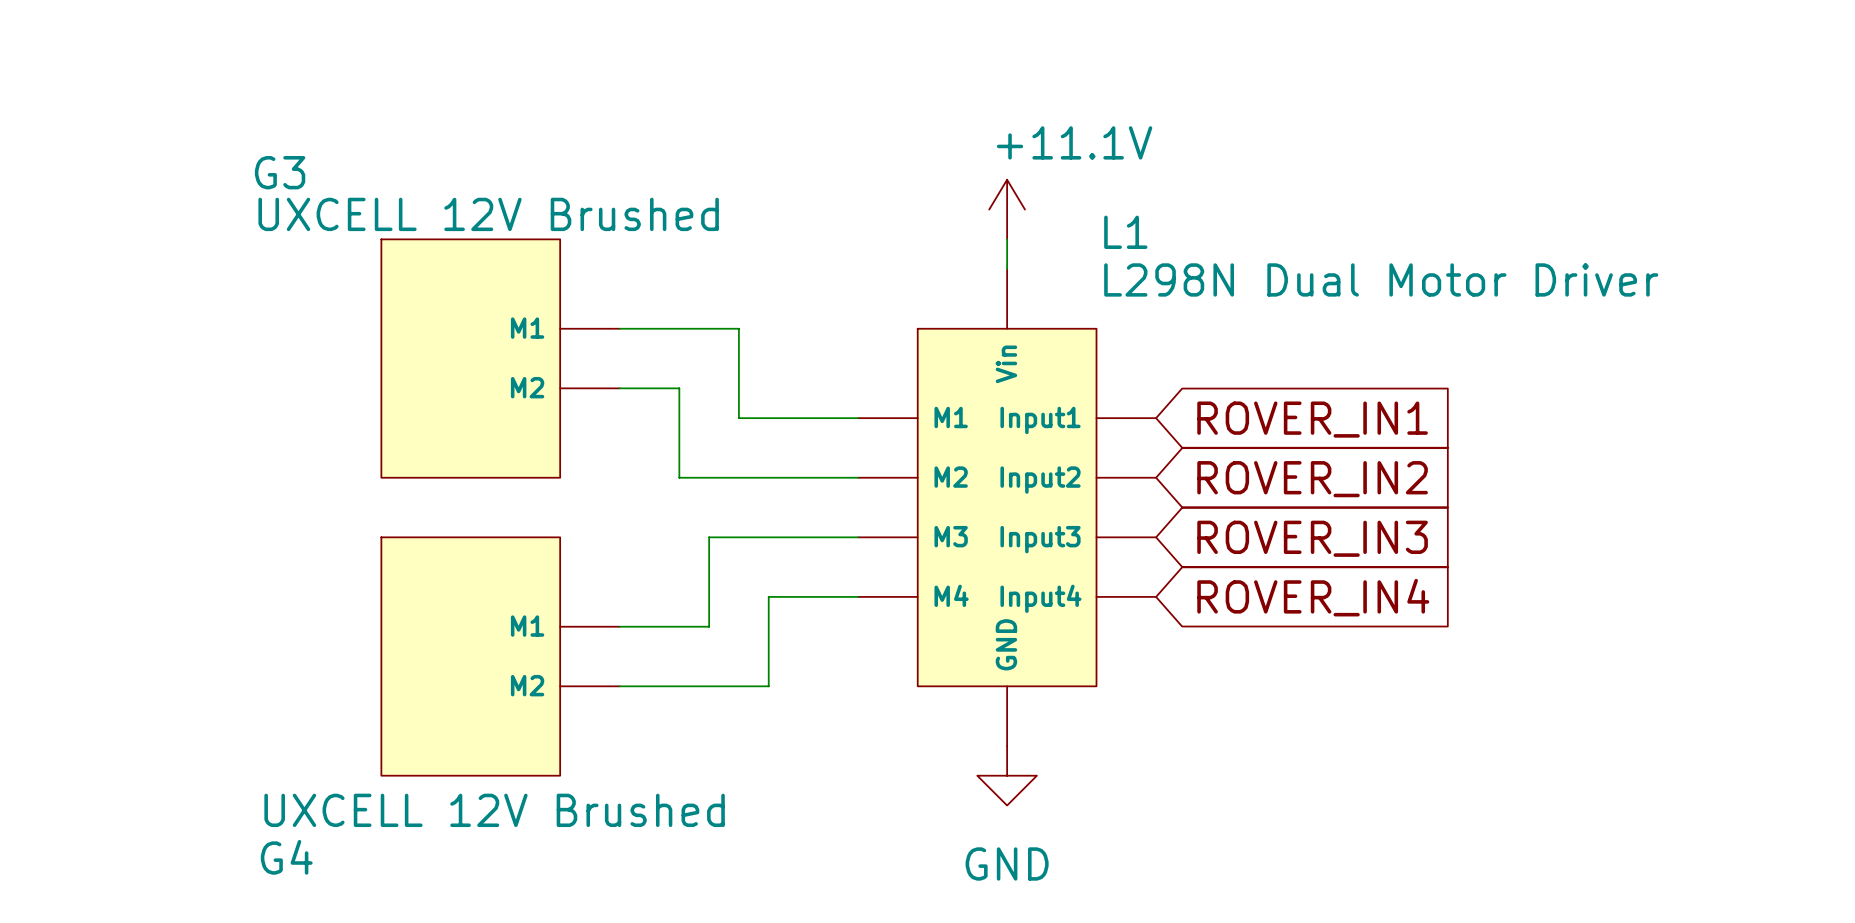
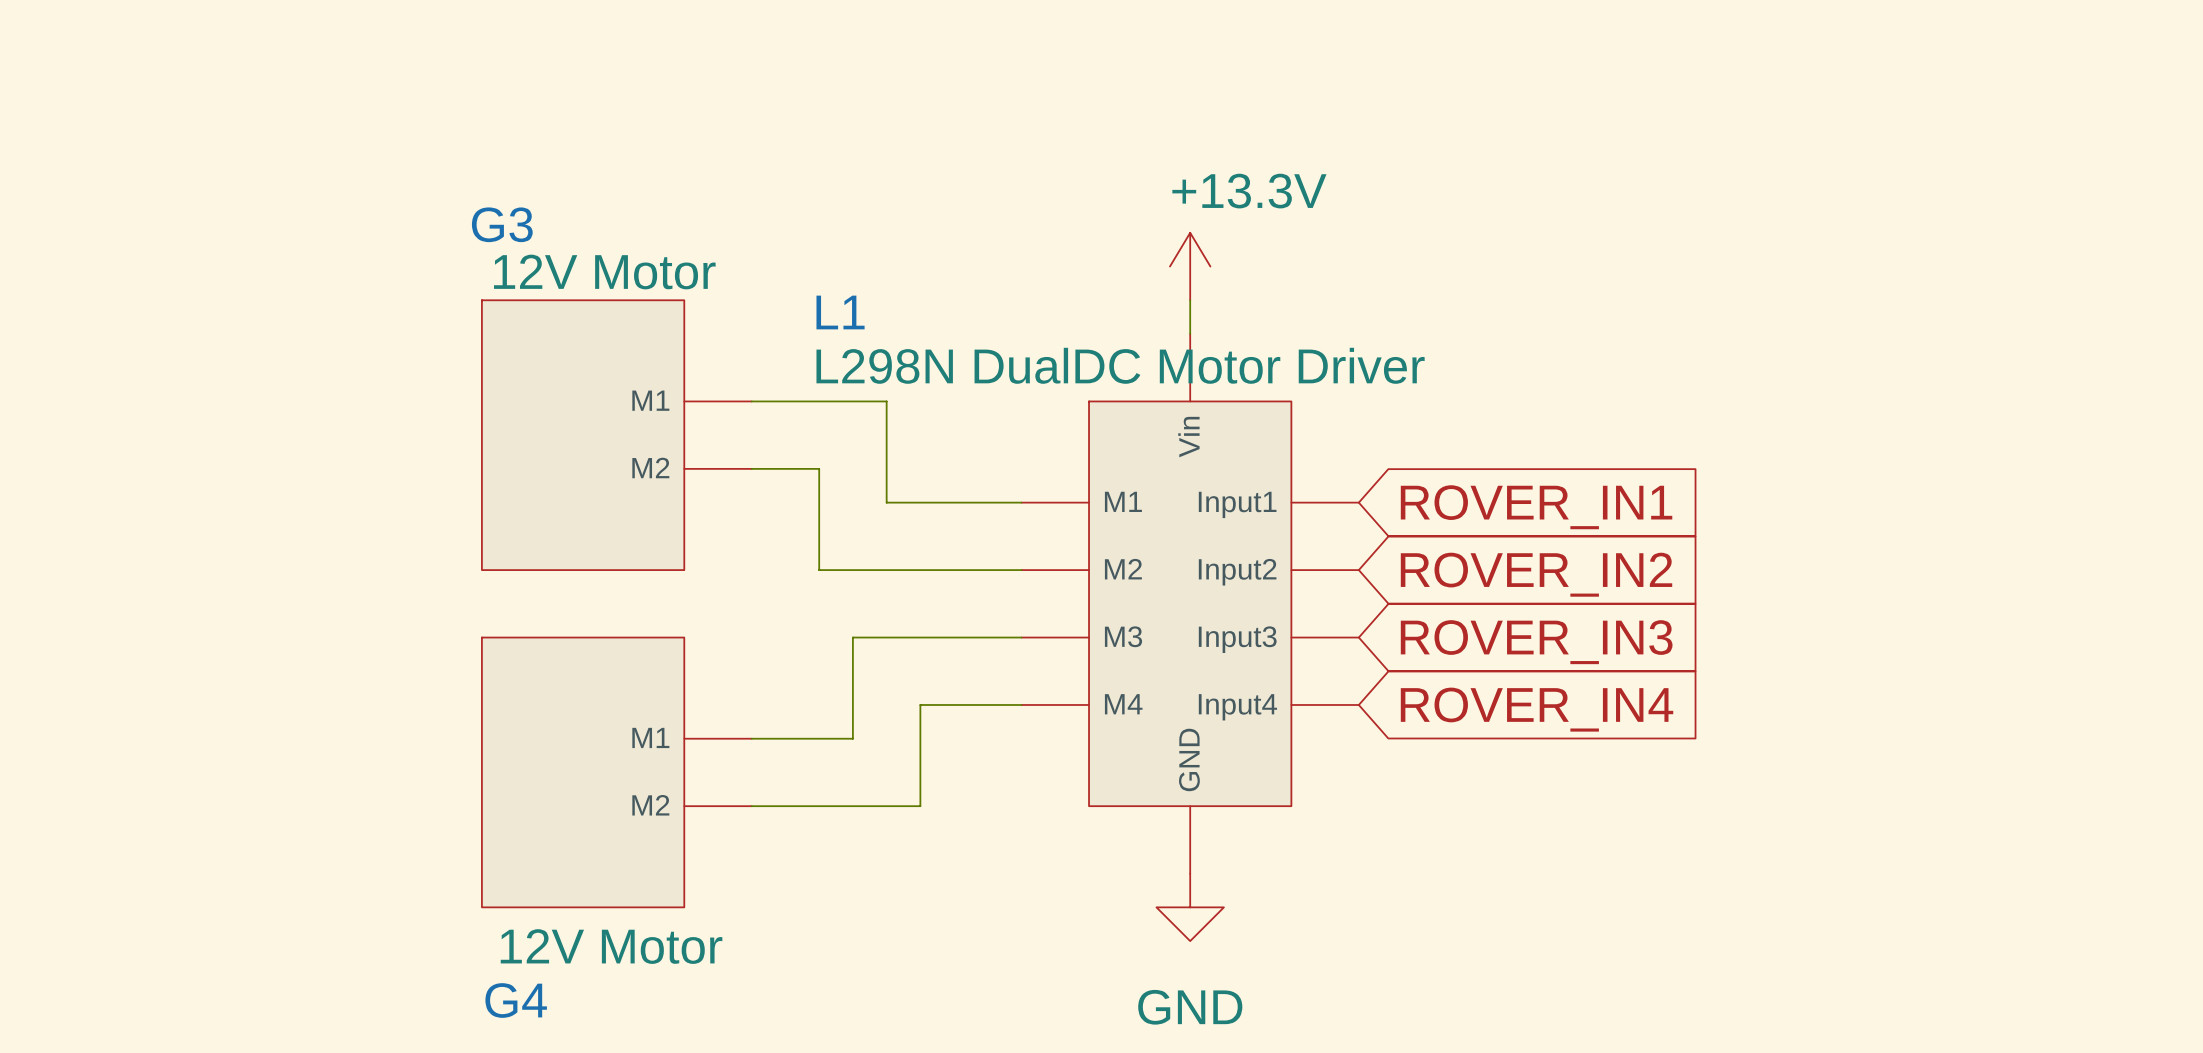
G3 name position: G3 (280, 172) -> G3 (502, 224)
power symbol: +11.1V (1007, 209) -> +13.3V (1190, 266)
G3 value: UXCELL 12V Brushed (488, 214) -> 12V Motor (604, 272)
L1 name position: L1 (1125, 232) -> L1 (840, 312)
L1 value: L298N Dual Motor Driver (1381, 279) -> L298N DualDC Motor Driver (1120, 365)
G4 value: UXCELL 12V Brushed (494, 810) -> 12V Motor (611, 946)
G4 name position: G4 (286, 857) -> G4 (516, 1000)

